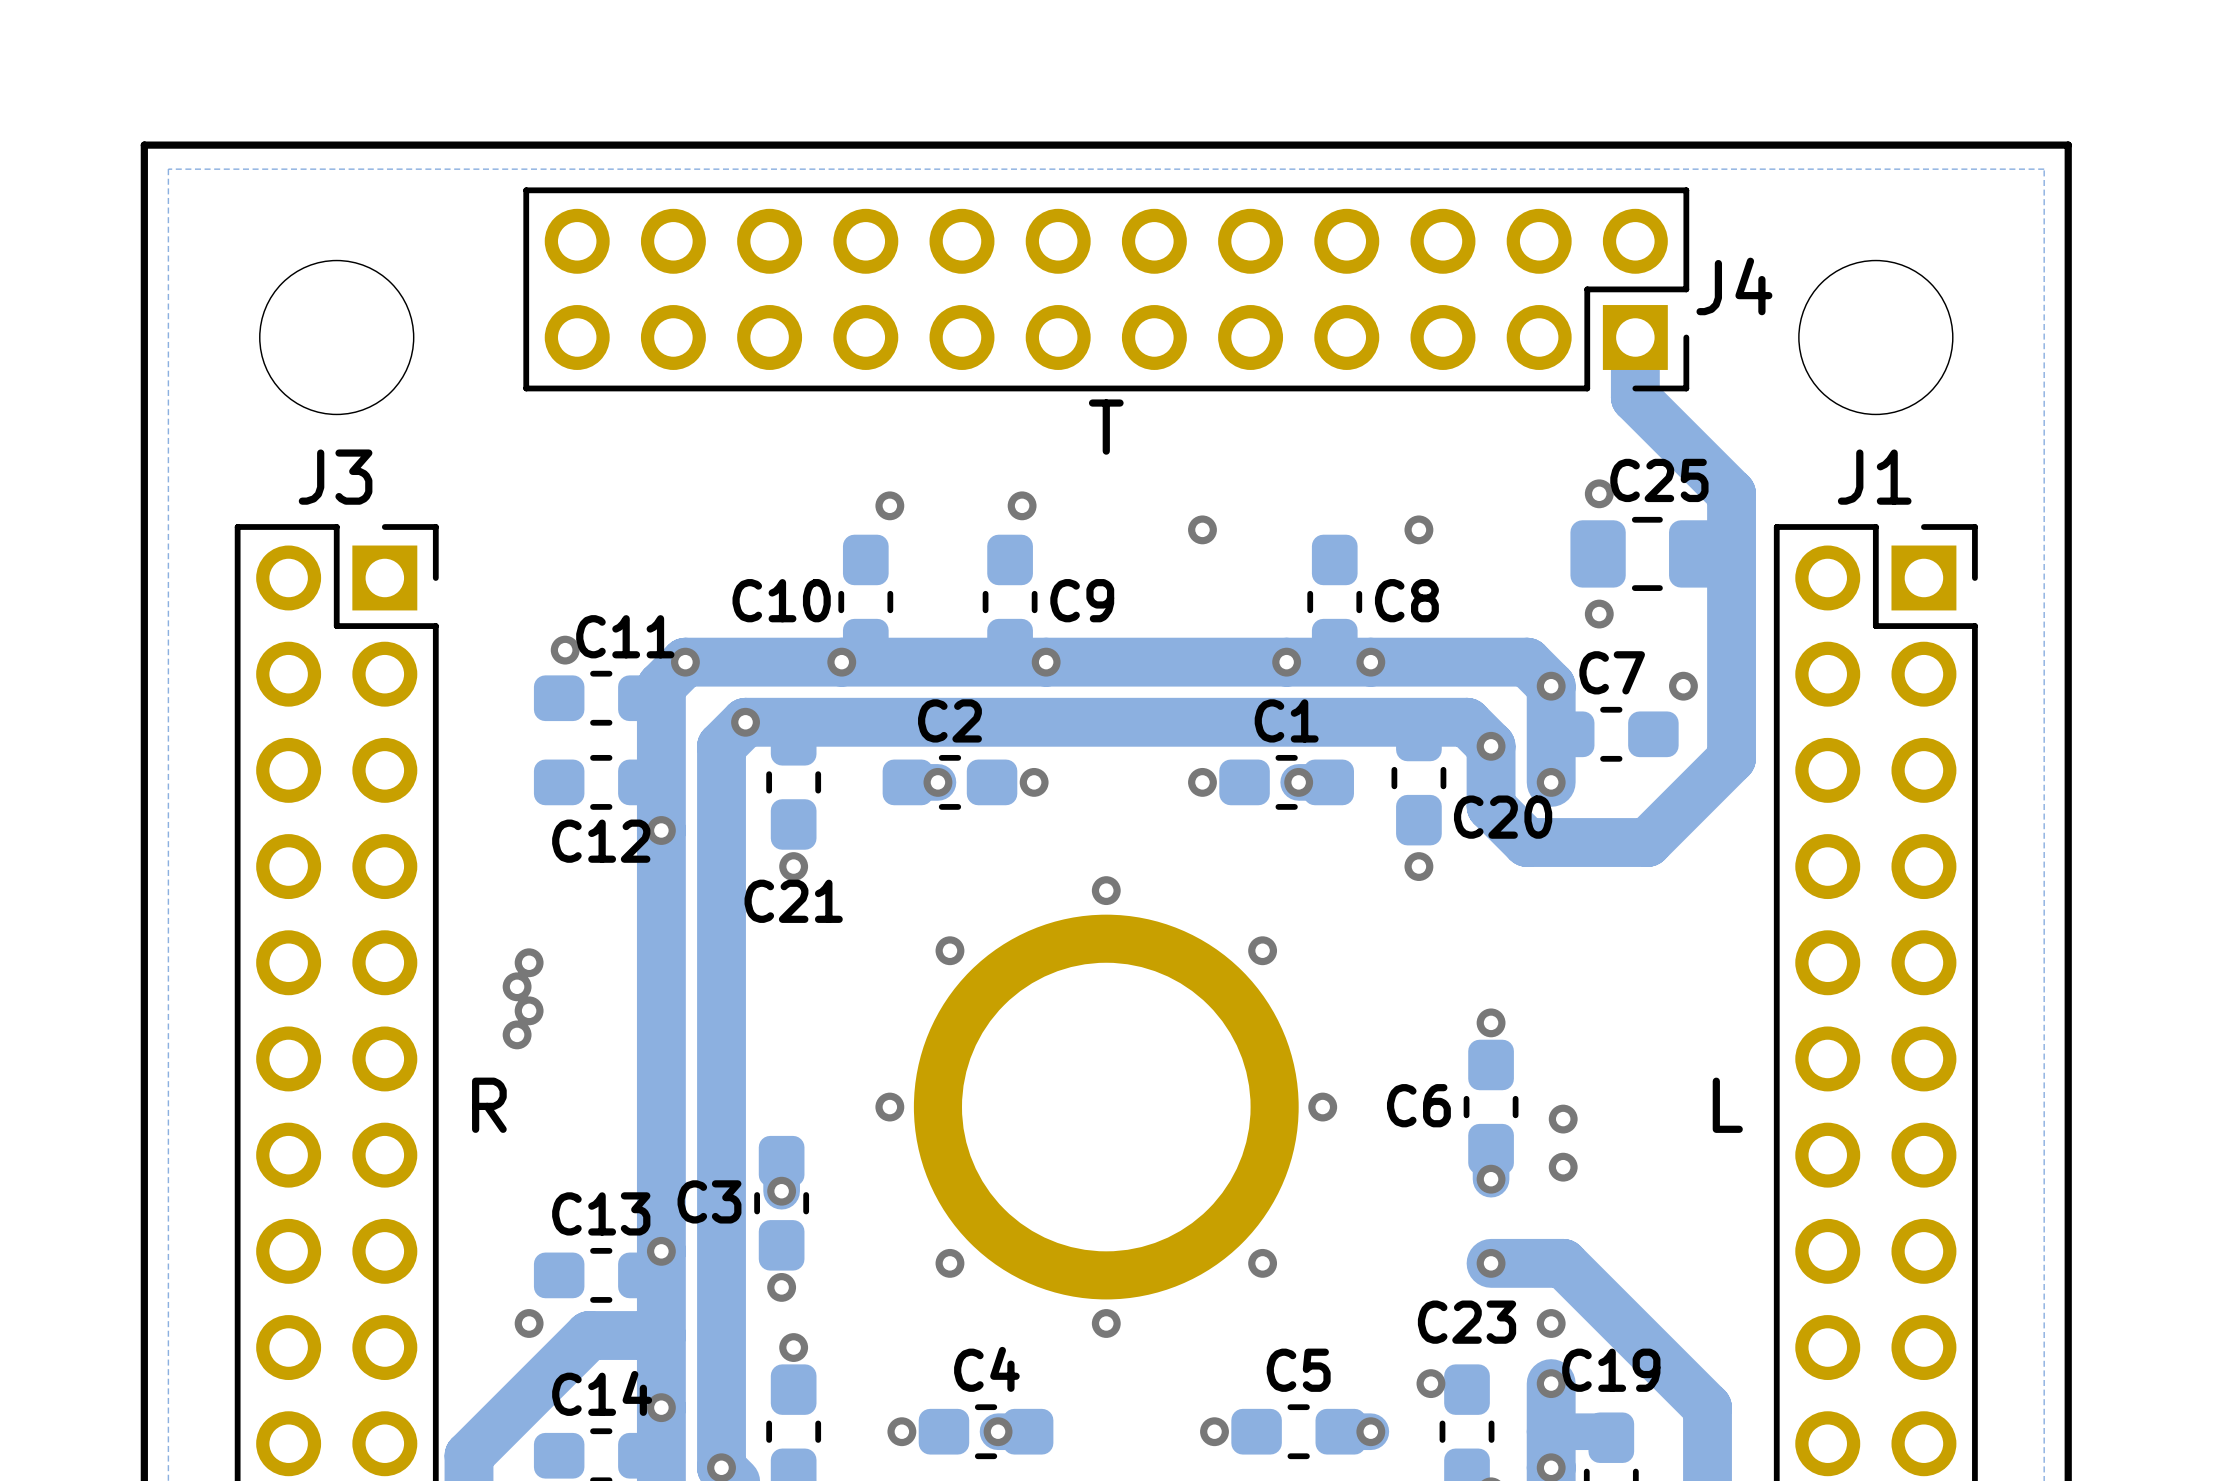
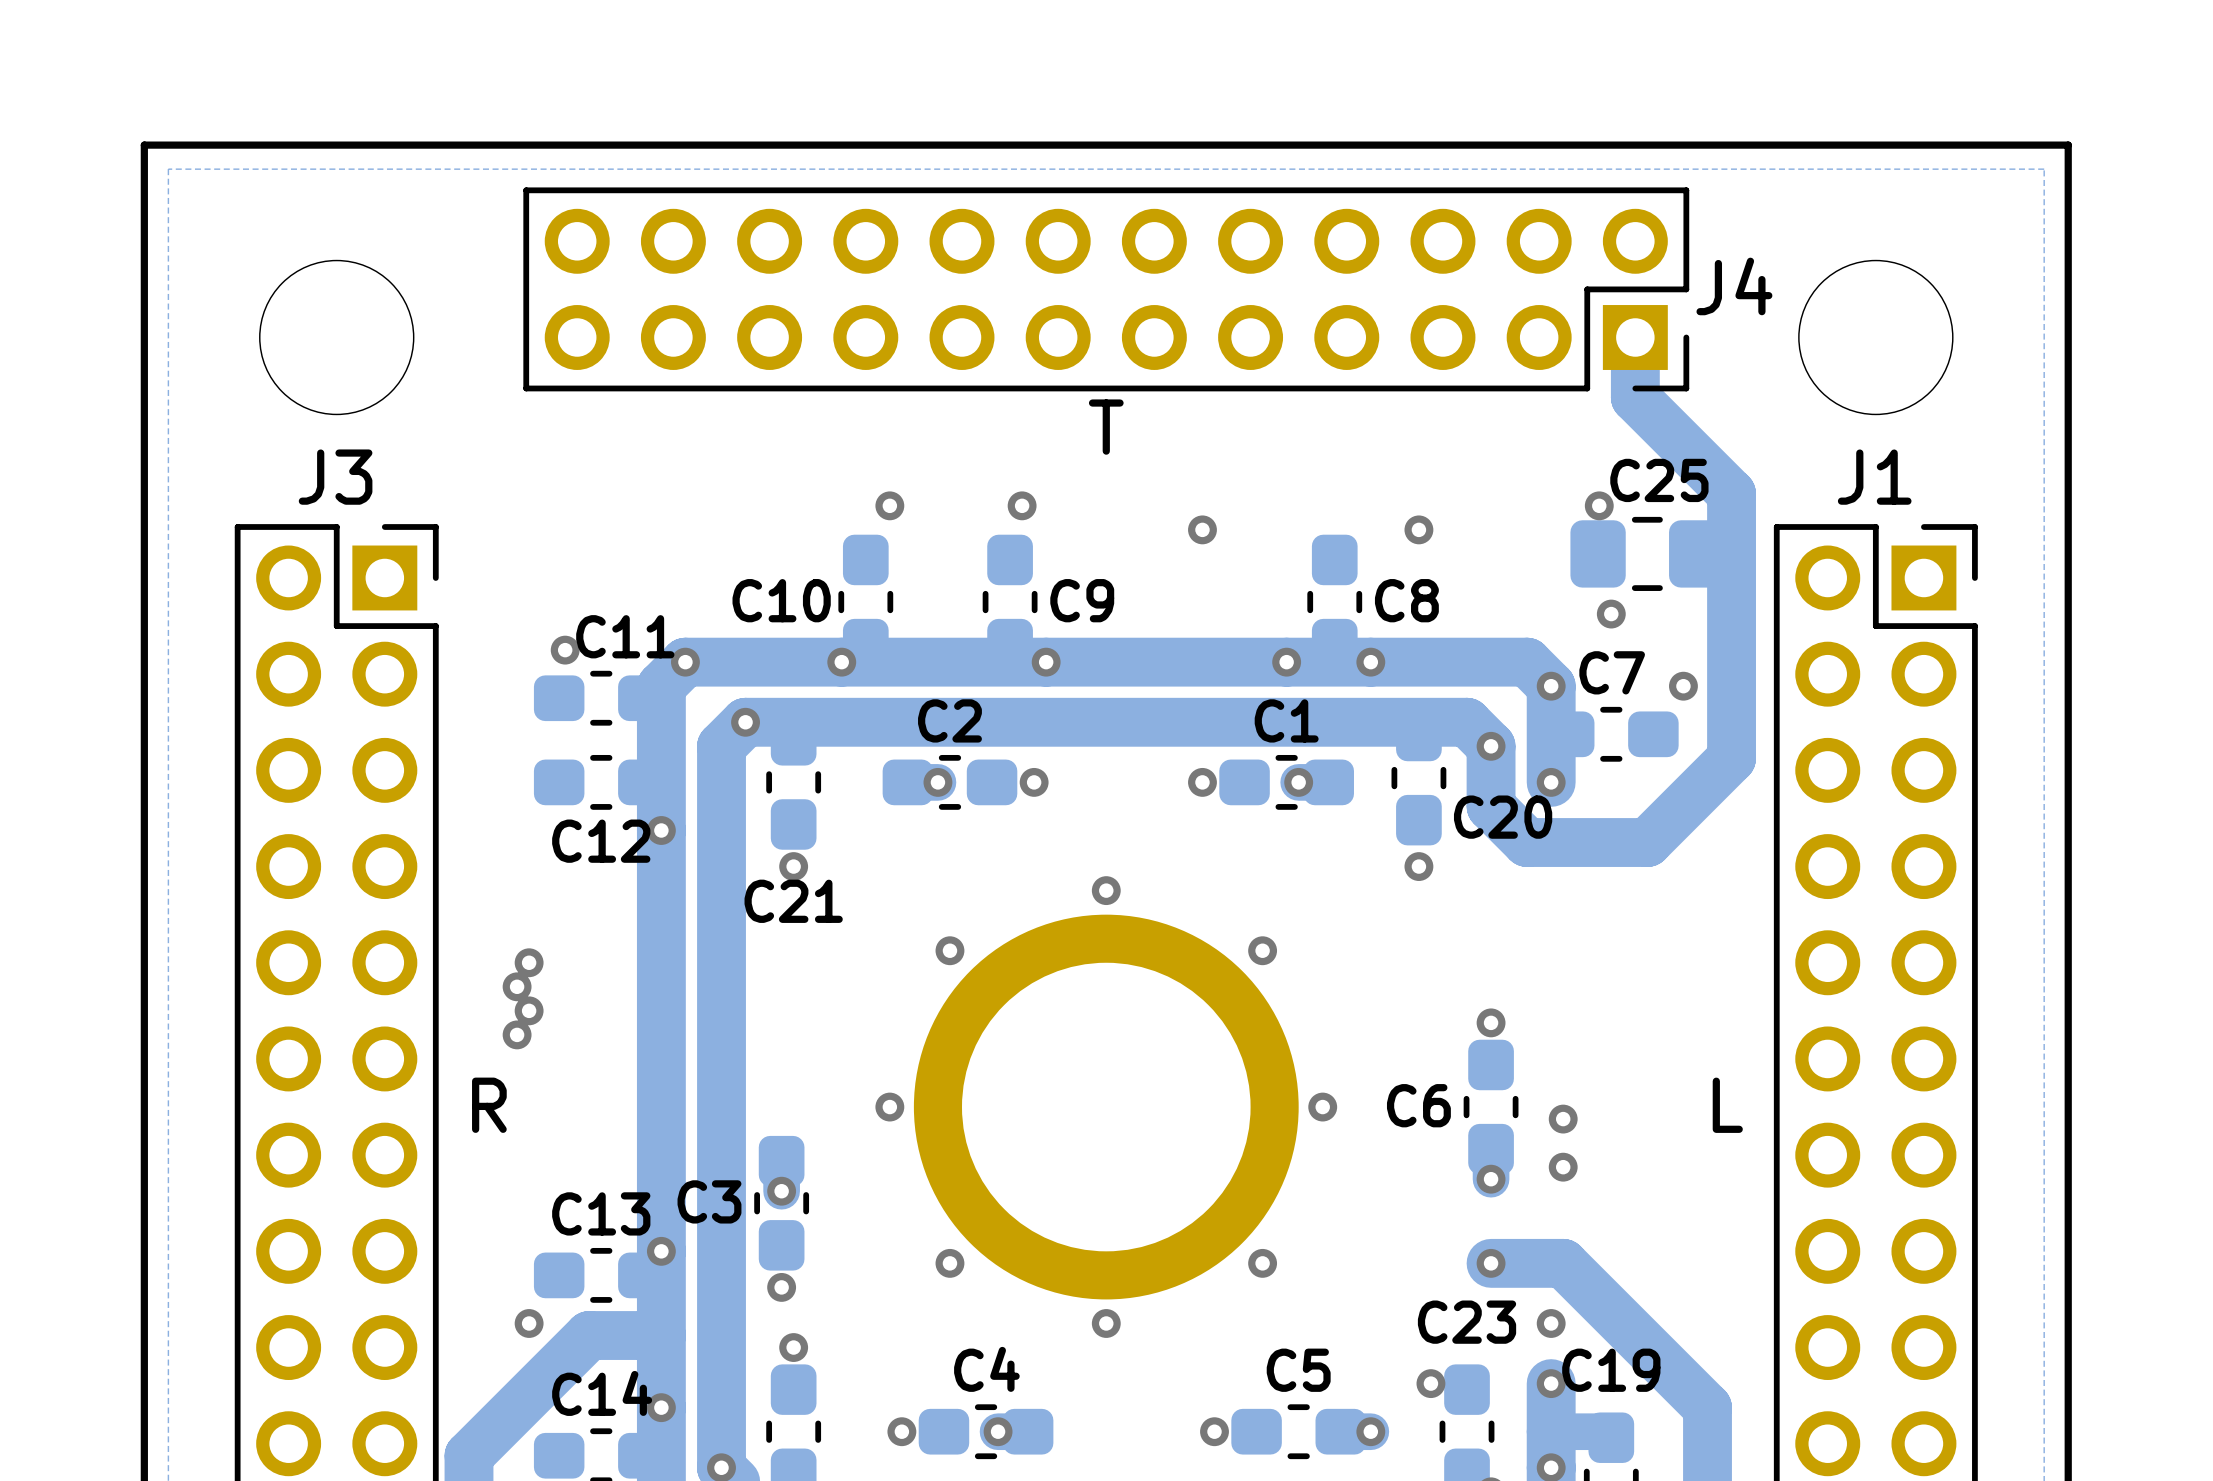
via position: (1599, 493) -> (1599, 505)
via position: (1599, 614) -> (1611, 614)

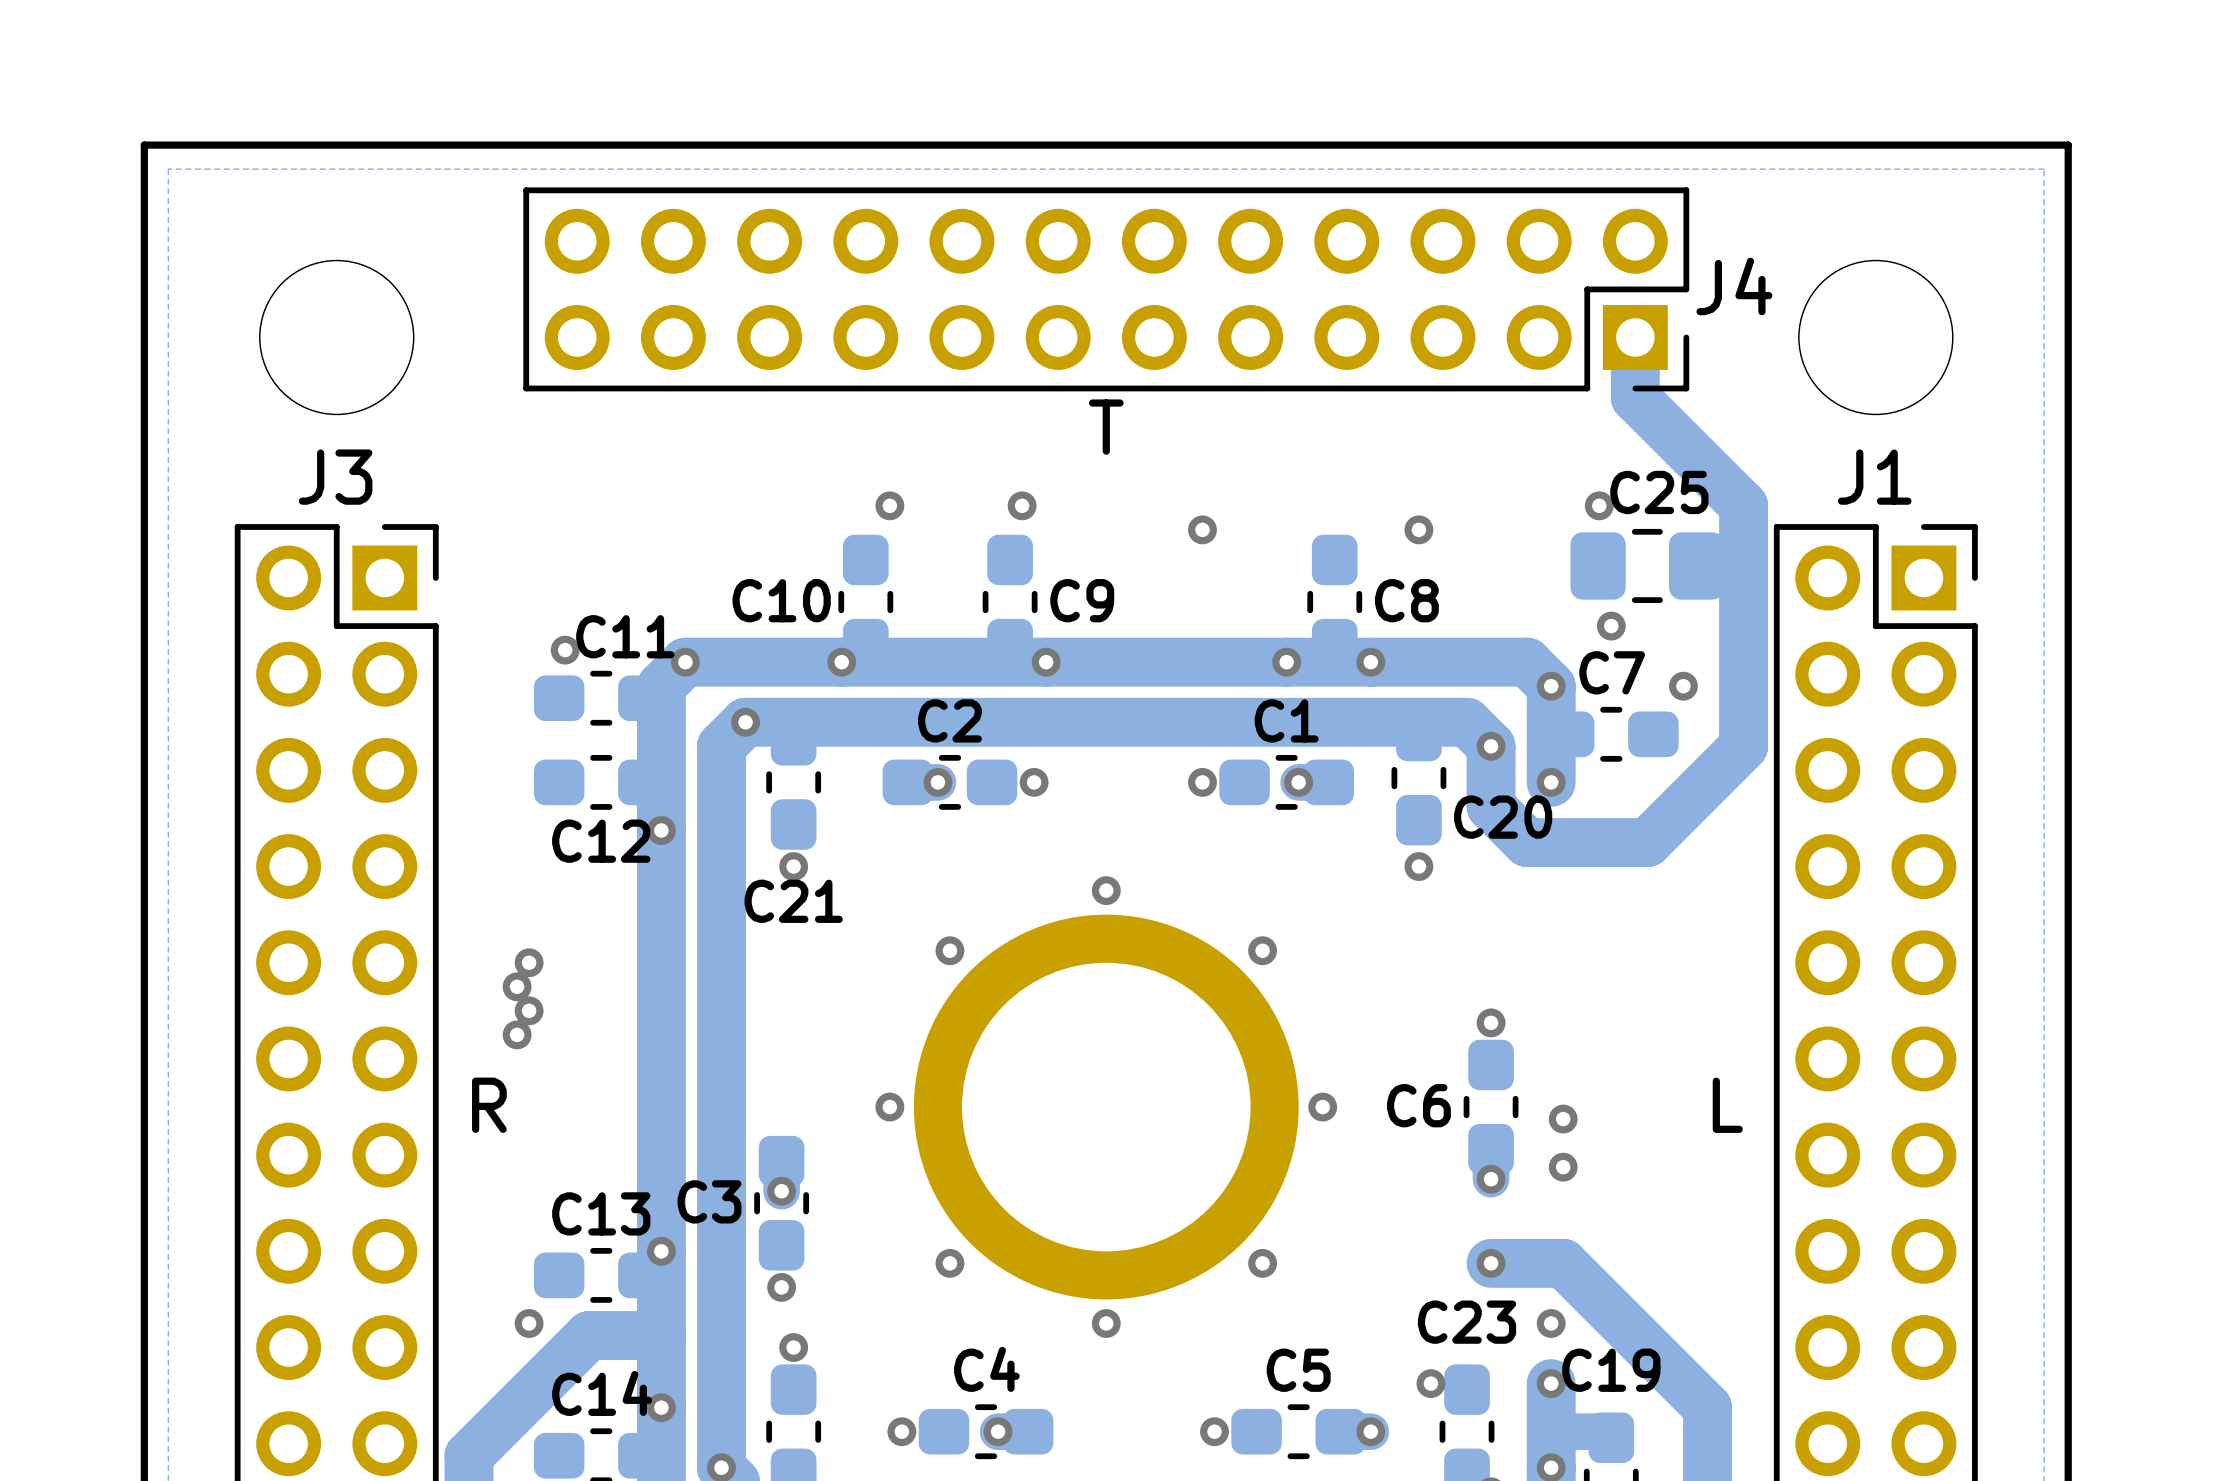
track: (1731, 493) (1731, 758) -> (1731, 493) (1743, 505) (1743, 746) (1731, 758)
C25 position: (1647, 553) -> (1647, 565)
via position: (1611, 614) -> (1611, 626)

